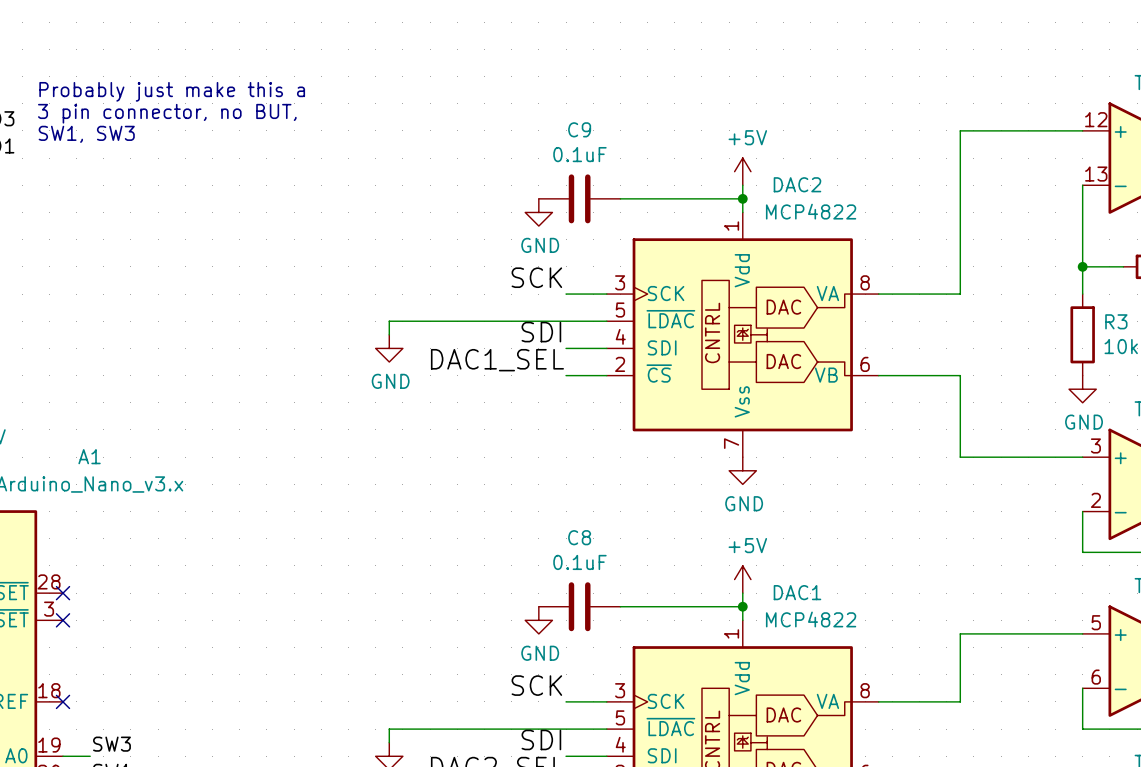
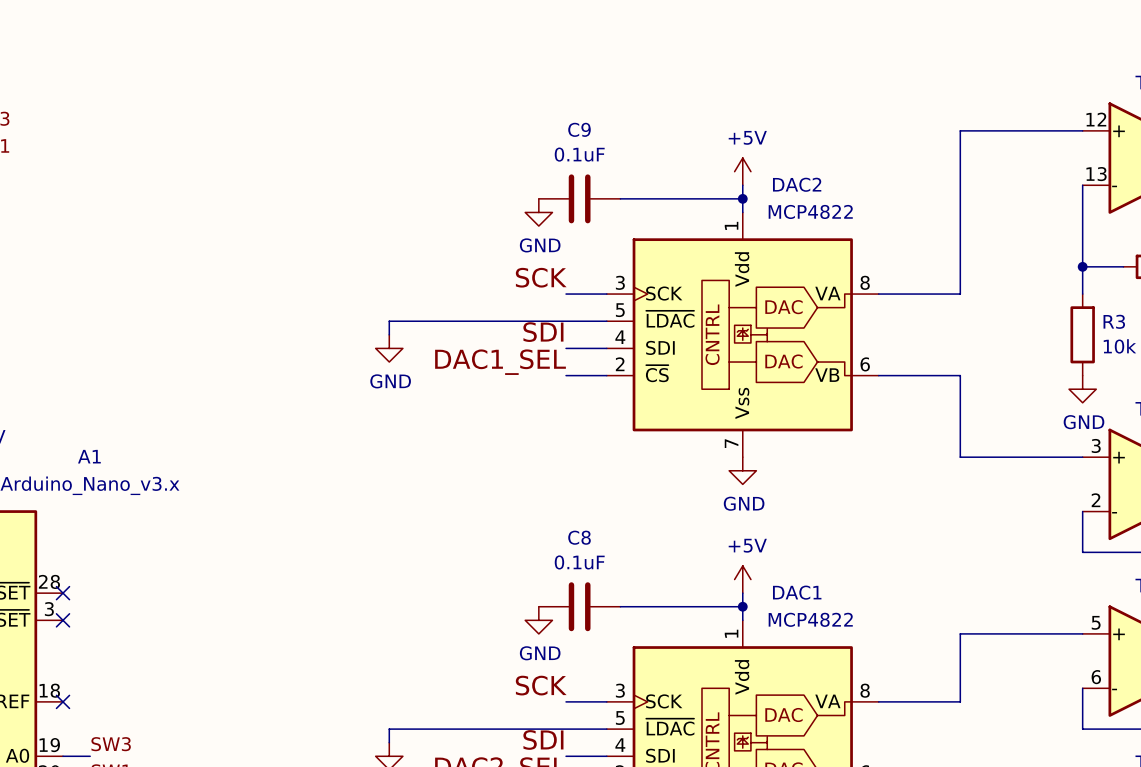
text: Probably just make this a (172, 91) -> none
text: 3 pin connector, no BUT, (167, 113) -> none
text: SW1, SW3 (86, 134) -> none

